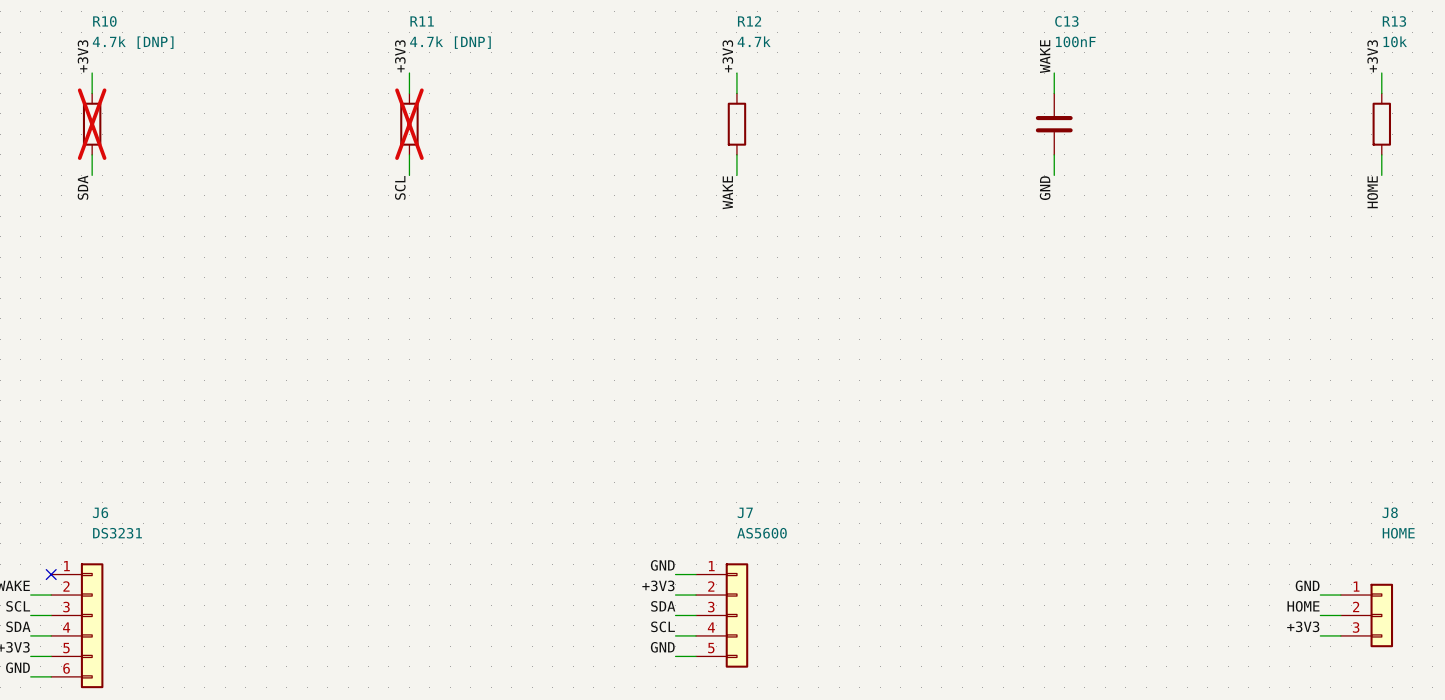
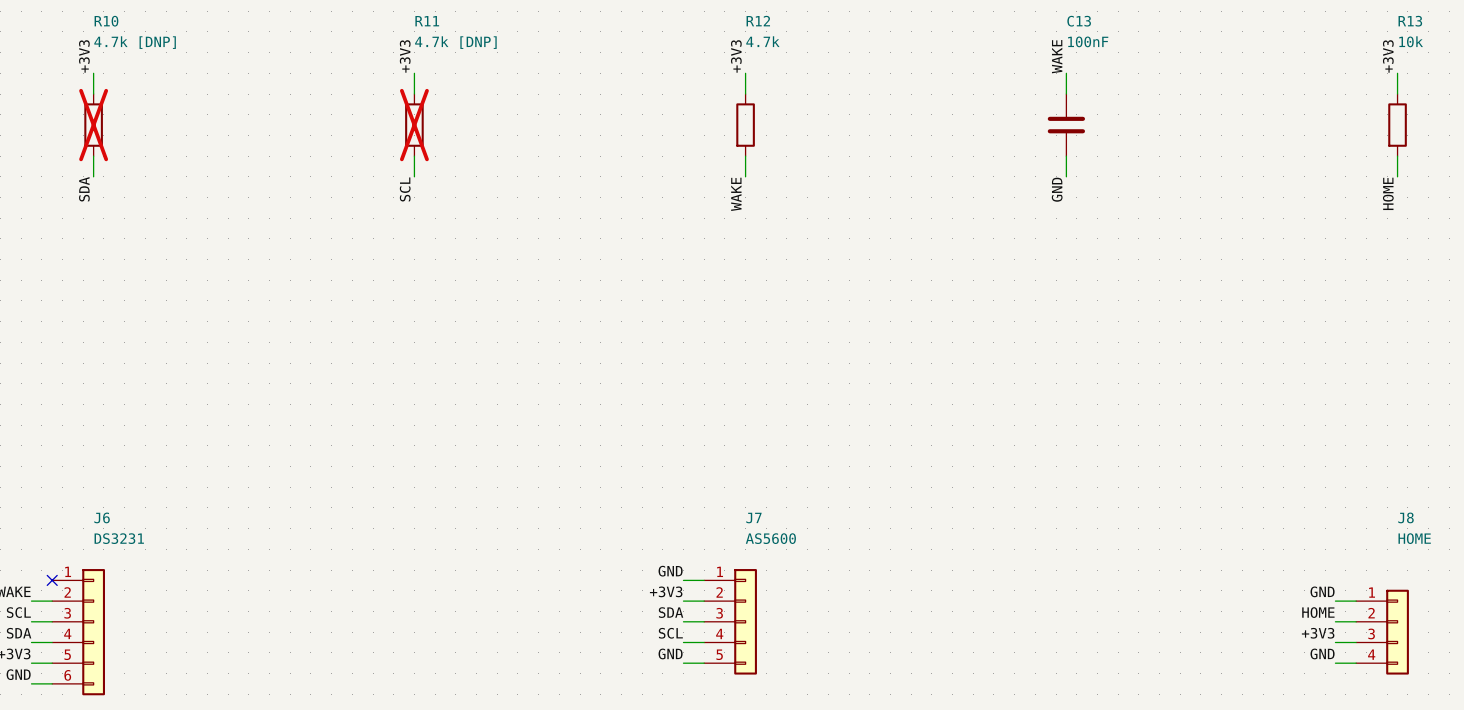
J8 symbol: [1340, 583, 1394, 648] -> [1356, 589, 1409, 675]
label: none -> GND (1322, 653)
wire: none -> (1335, 663) (1356, 663)

